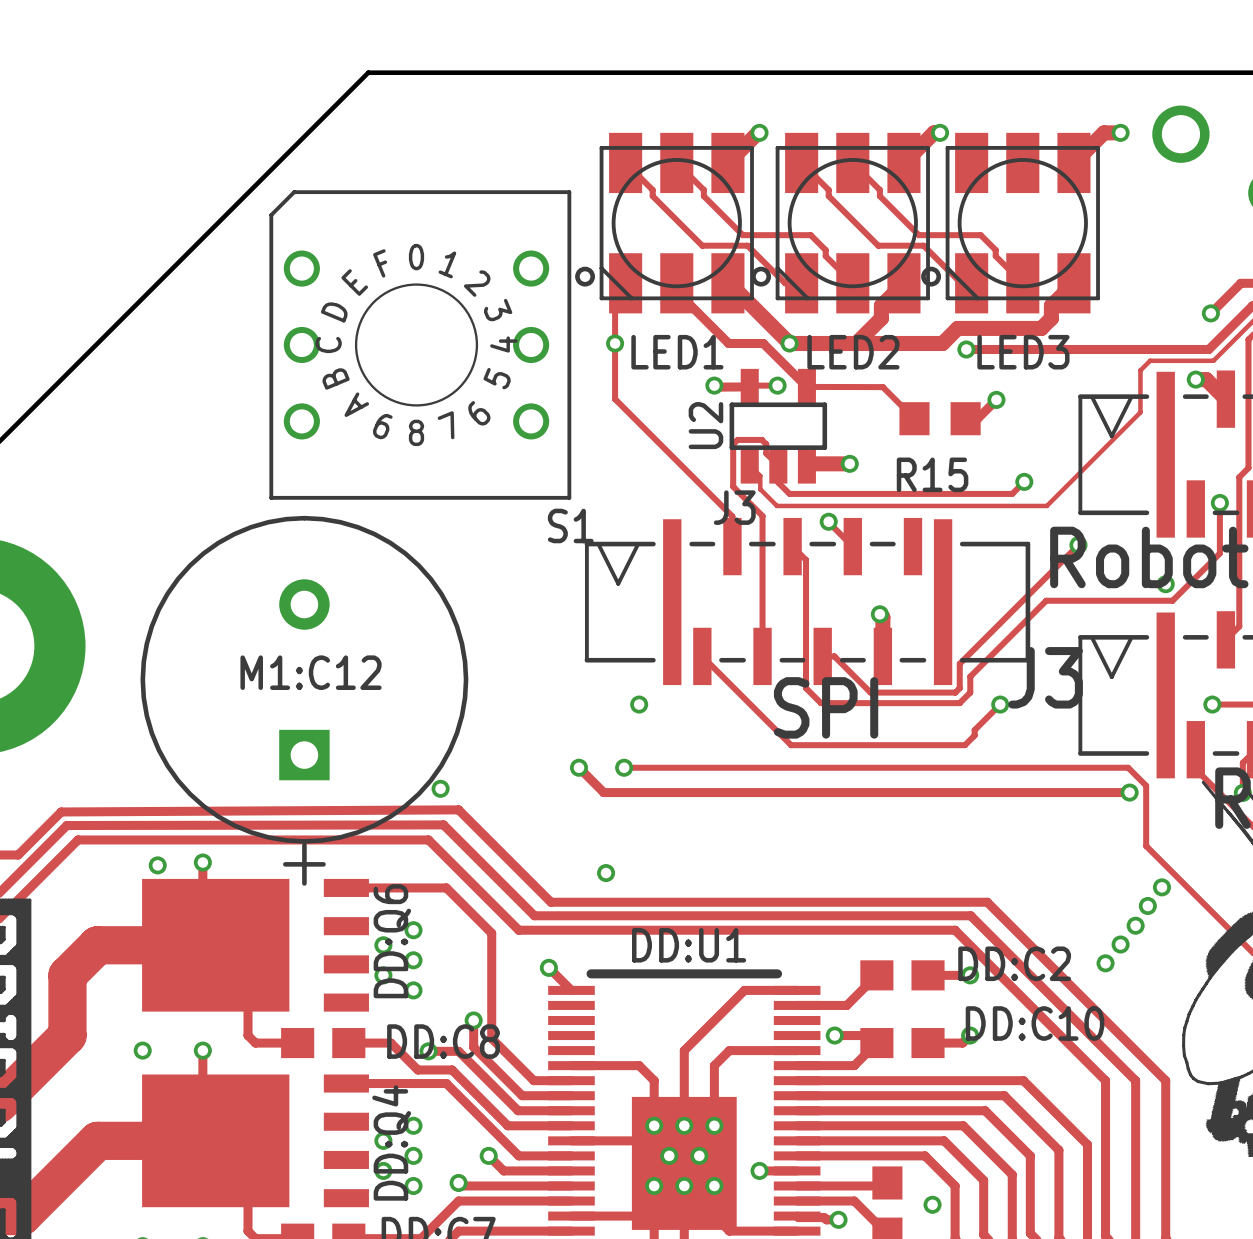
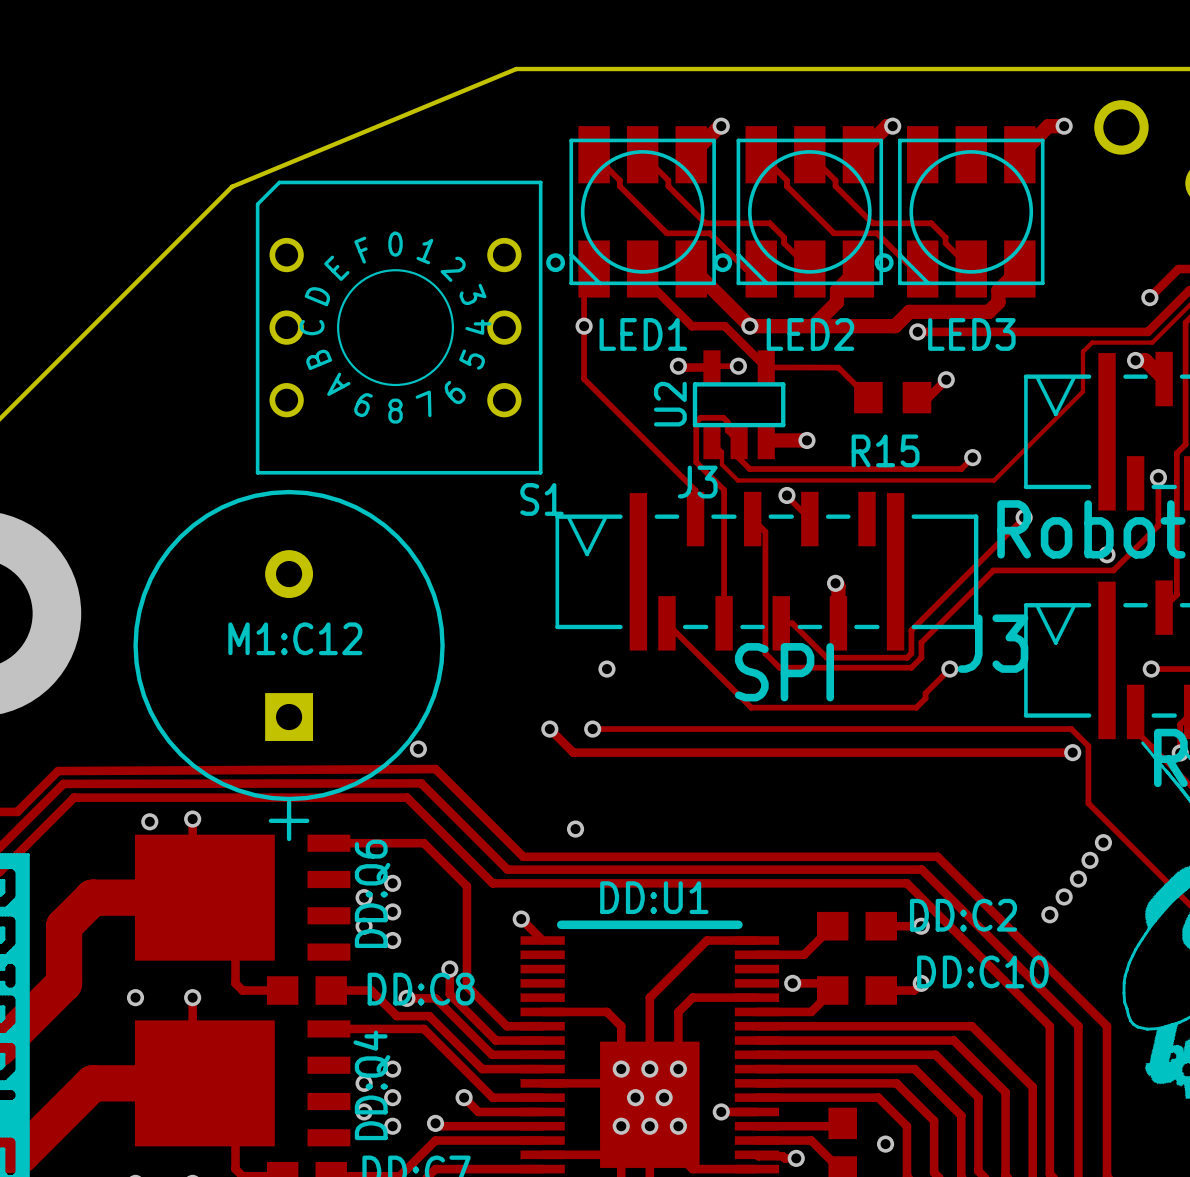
board edge: (543, 72) (368, 72) (244, 196) -> (516, 69) (232, 186)

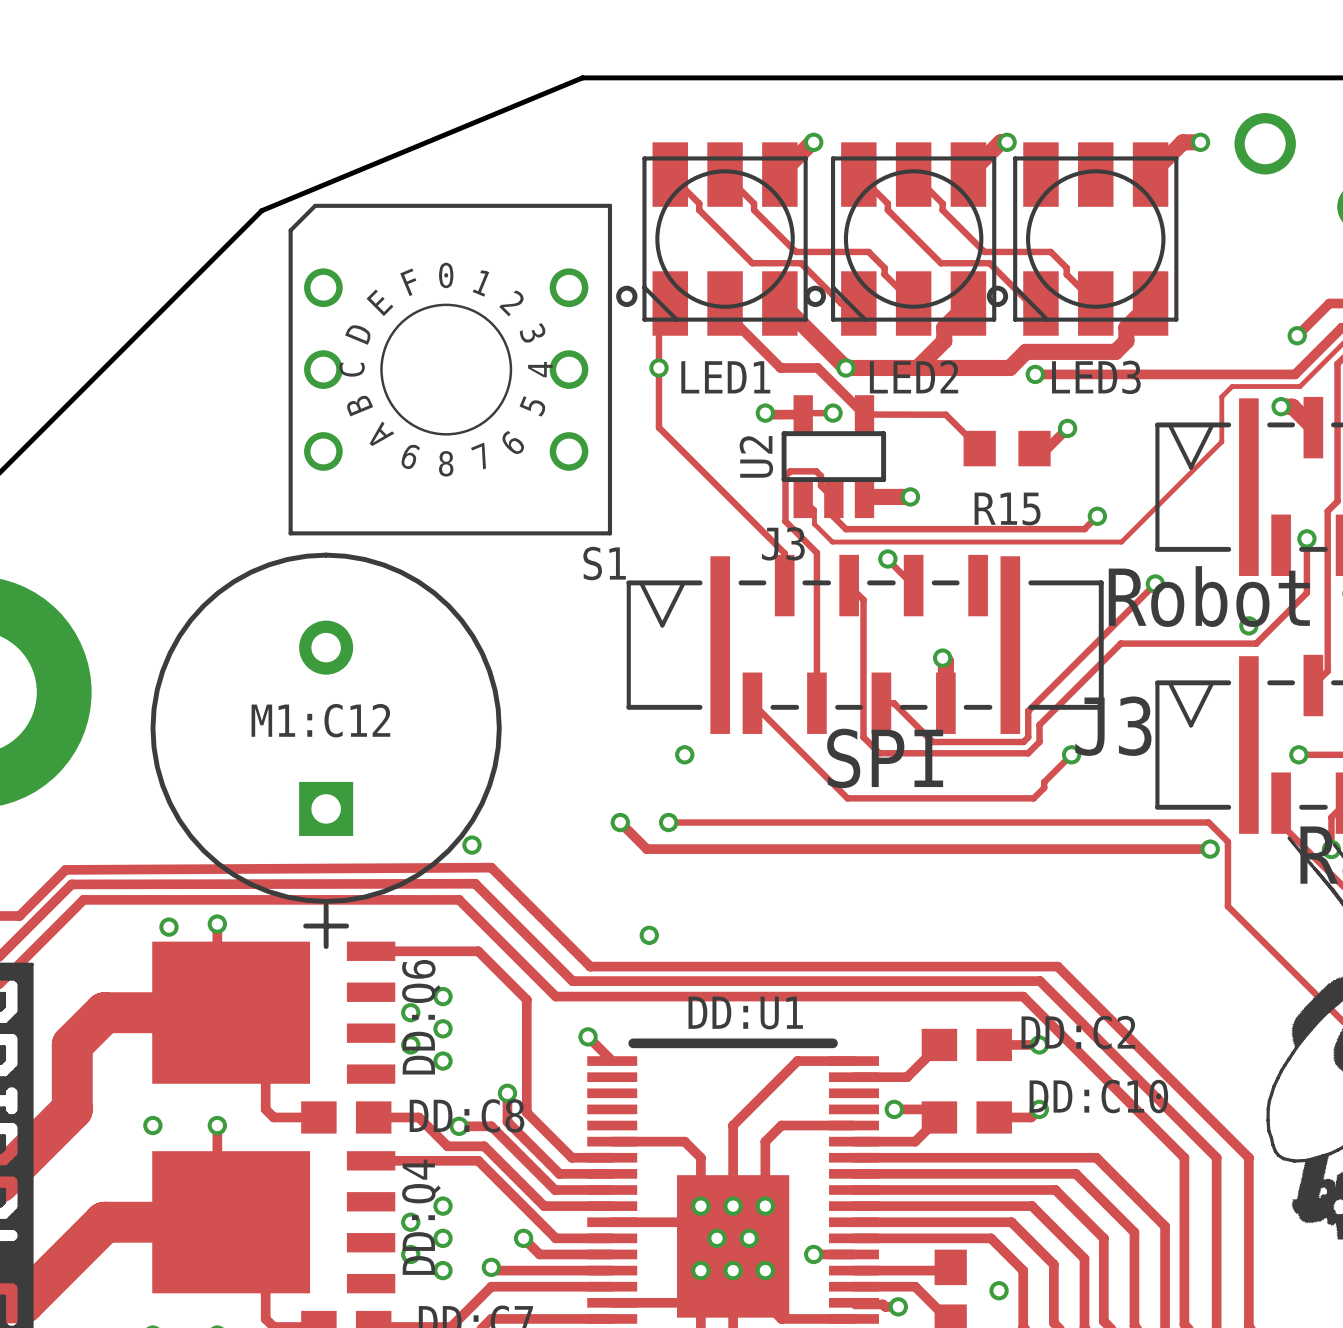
via: (1103, 842) -> none
via: (1090, 860) -> none
via: (1078, 879) -> none
via: (1064, 896) -> none
via: (1049, 914) -> none

